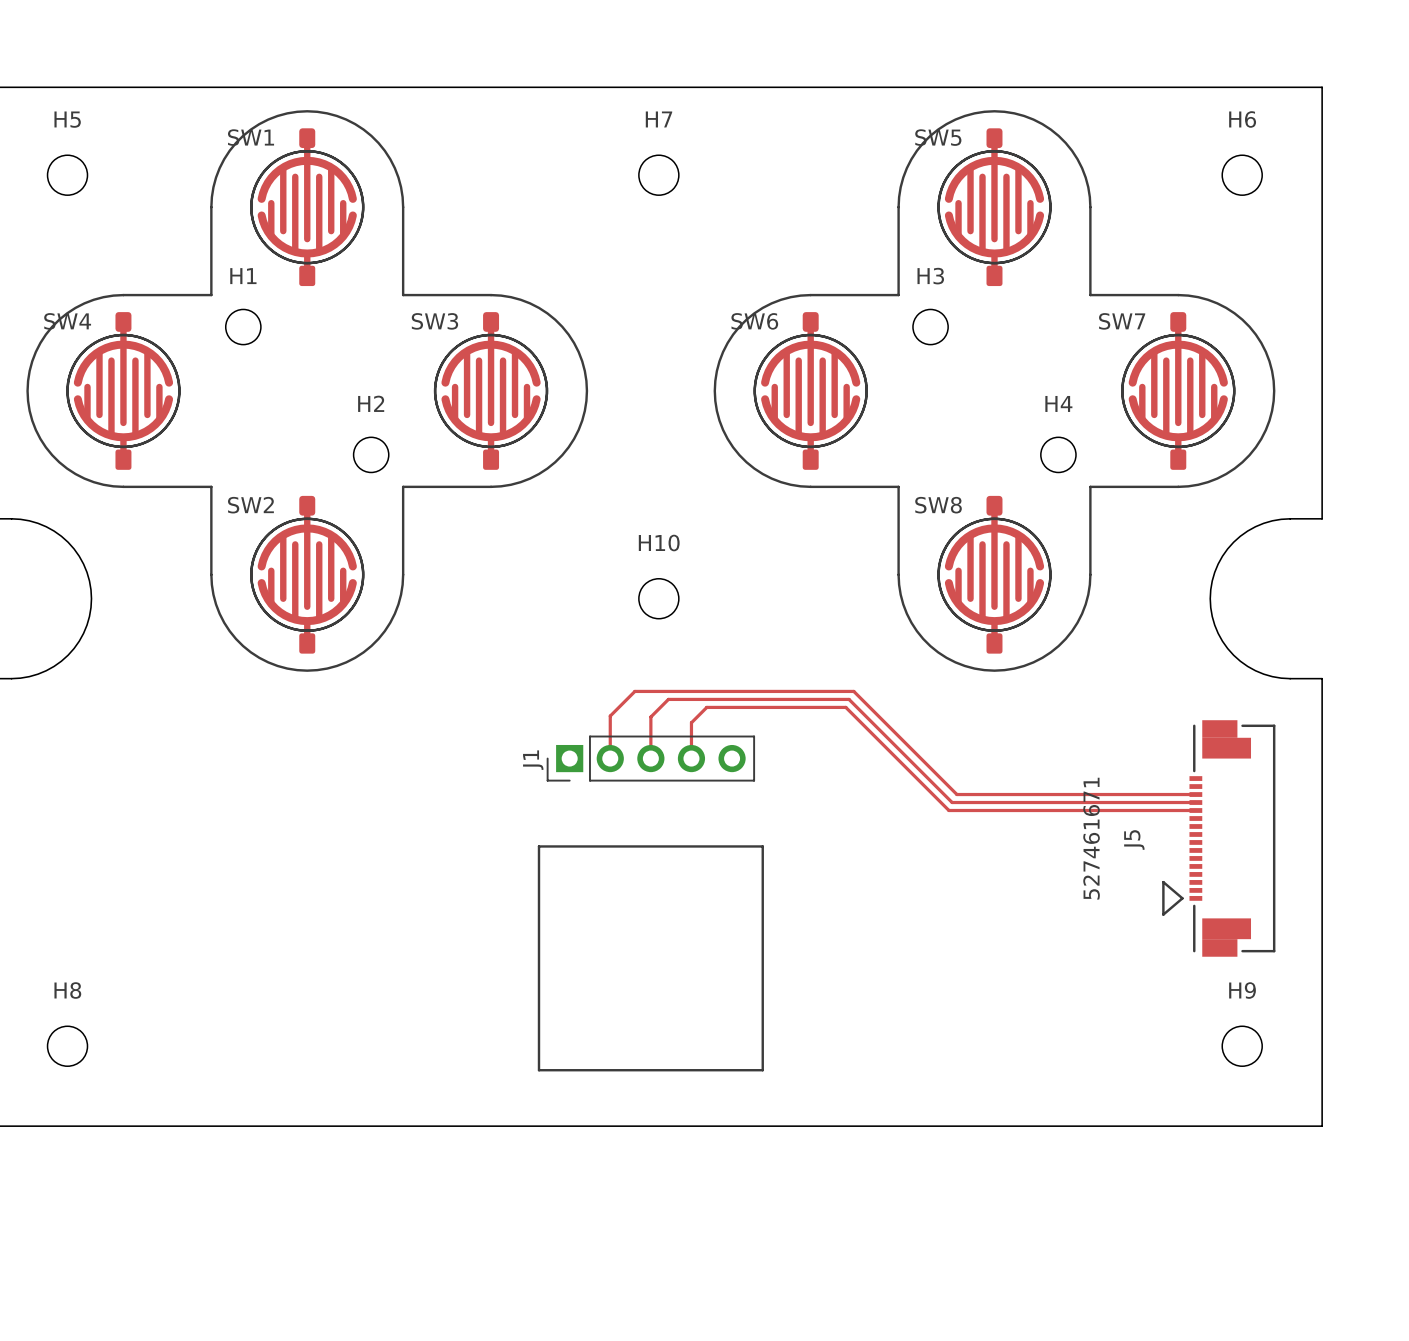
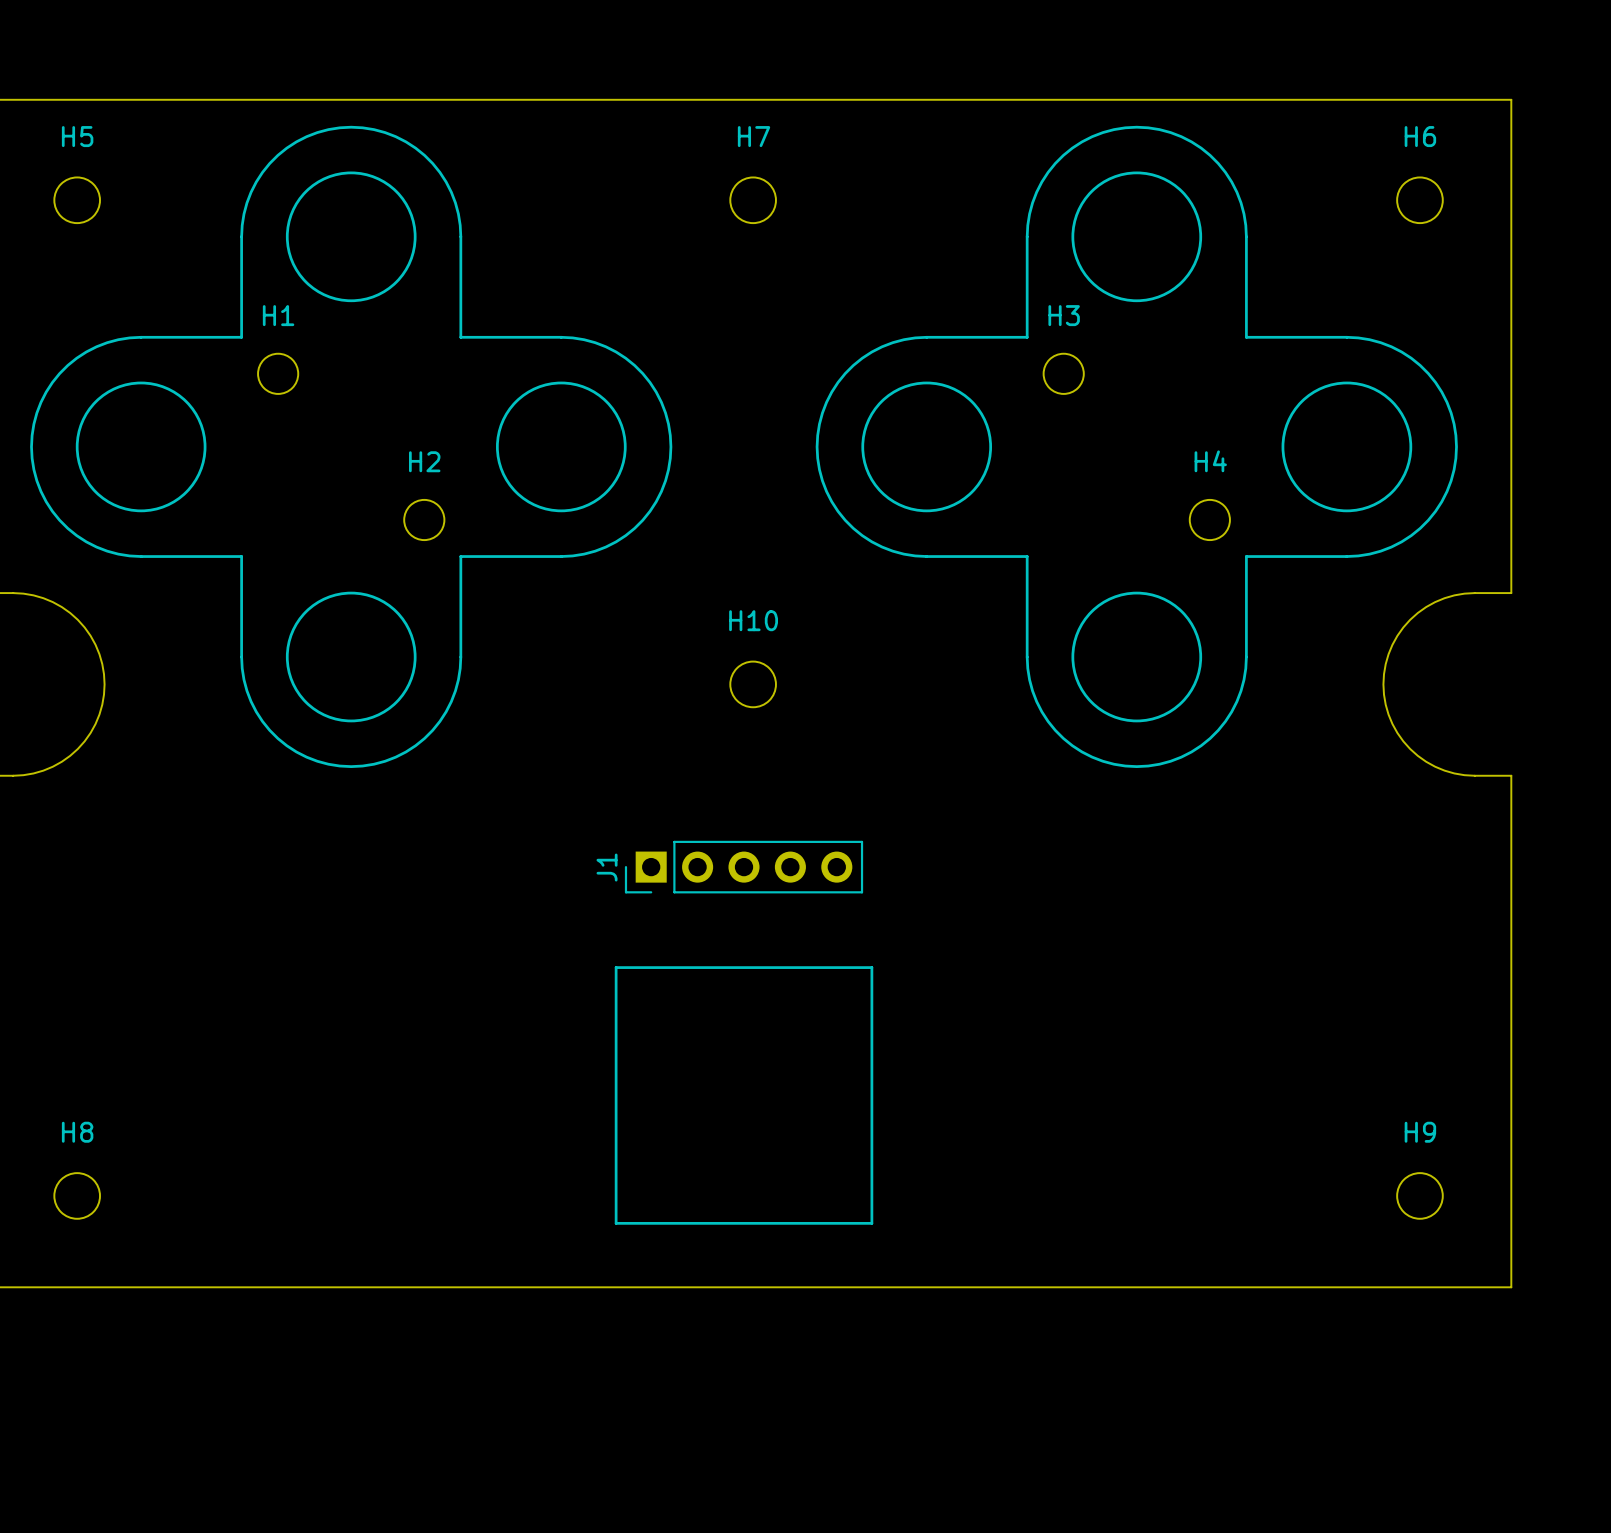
SW1: (307, 207) -> none
SW5: (994, 207) -> none
SW4: (123, 390) -> none
SW3: (491, 390) -> none
SW6: (810, 390) -> none
SW7: (1178, 390) -> none
SW2: (307, 574) -> none
SW8: (994, 574) -> none
top track: (610, 758) (610, 716) (634, 691) (853, 691) (956, 794) (1195, 794) -> none
top track: (650, 758) (650, 717) (668, 699) (849, 699) (952, 802) (1195, 802) -> none
top track: (691, 758) (691, 722) (706, 707) (845, 707) (948, 810) (1195, 810) -> none
J5: (1218, 838) -> none

